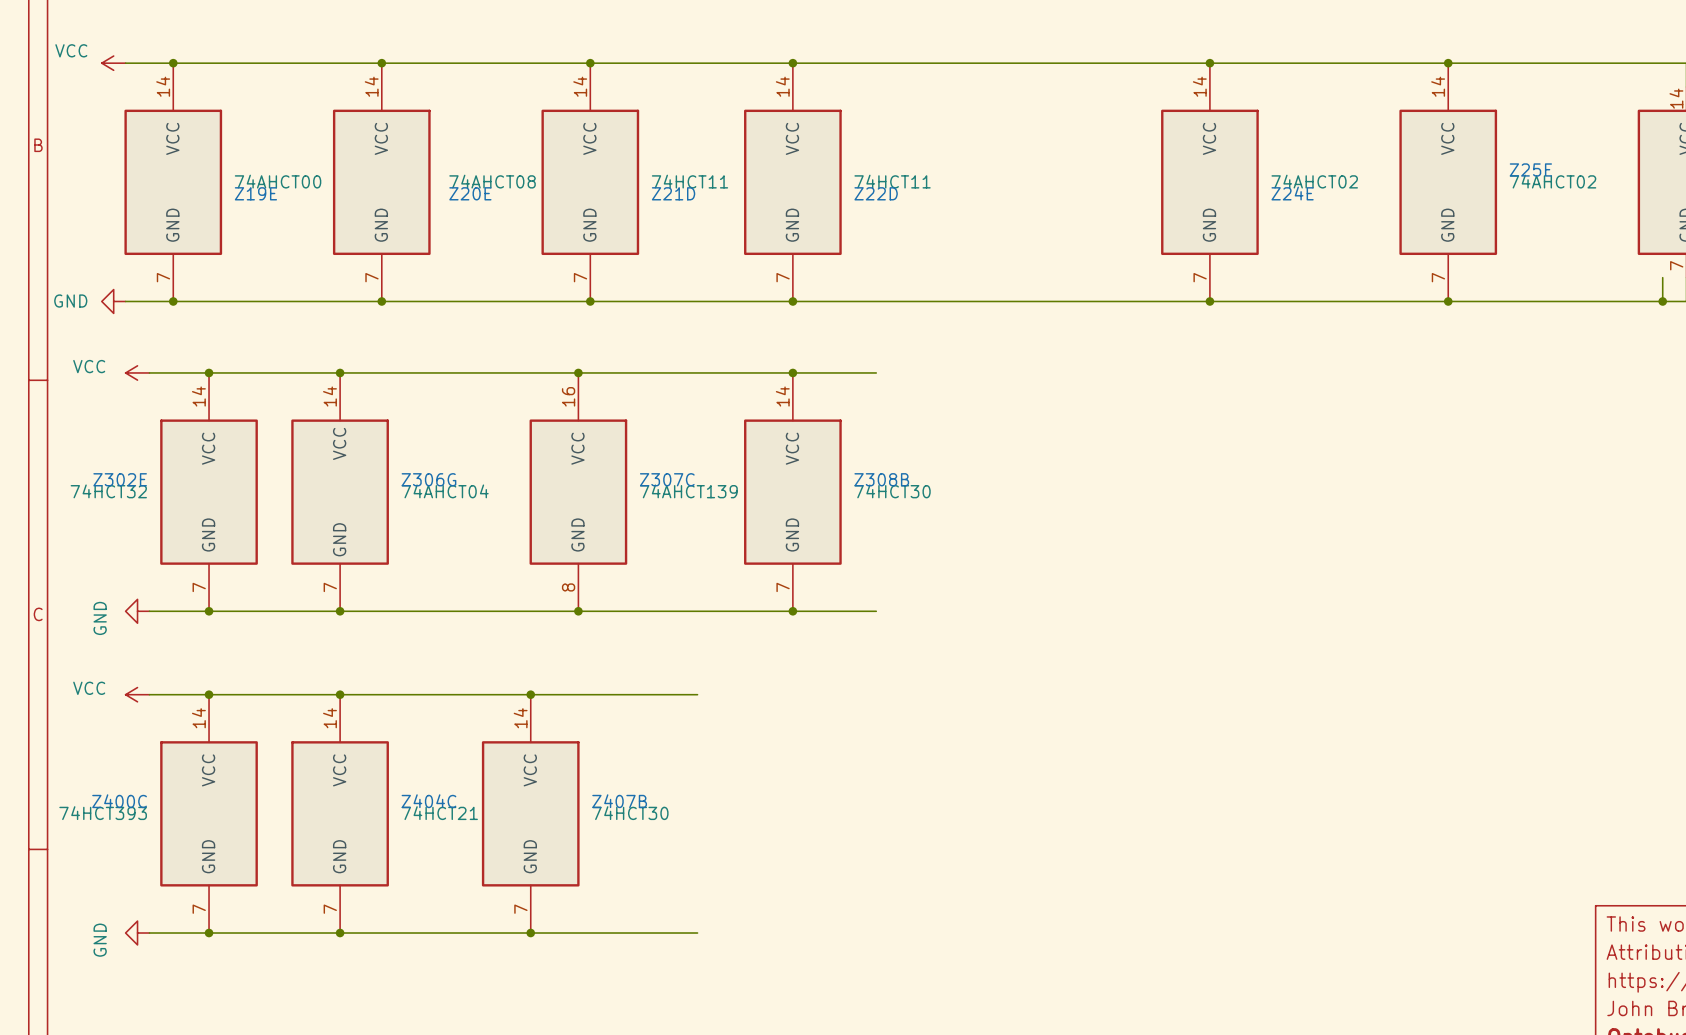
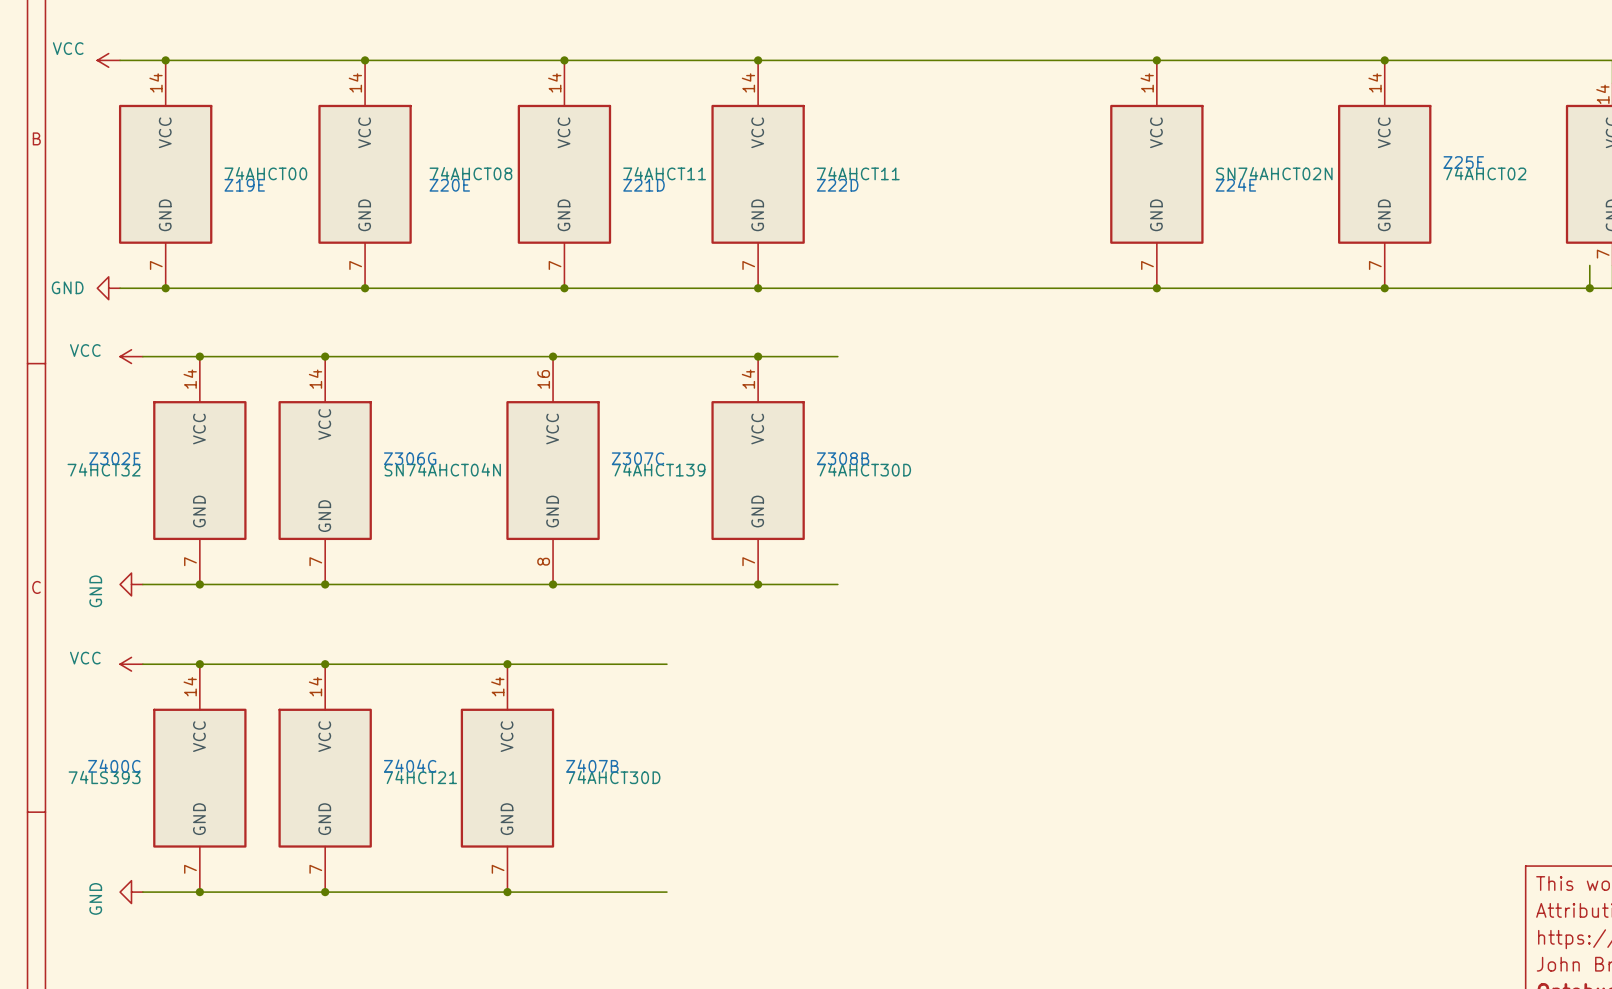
Z21D value: 74HCT11 (689, 181) -> 74AHCT11 (664, 173)
Z22D value: 74HCT11 (892, 181) -> 74AHCT11 (858, 173)
Z24E value: 74AHCT02 (1314, 181) -> SN74AHCT02N (1274, 173)
Z306G value: 74AHCT04 (445, 491) -> SN74AHCT04N (442, 469)
Z308B value: 74HCT30 (892, 491) -> 74AHCT30D (863, 469)
Z400C value: 74HCT393 (103, 813) -> 74LS393 (104, 777)
Z407B value: 74HCT30 (630, 813) -> 74AHCT30D (613, 777)

